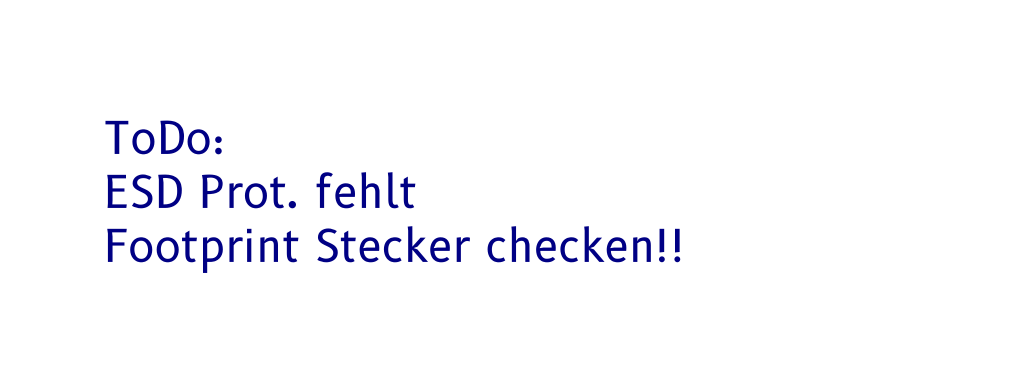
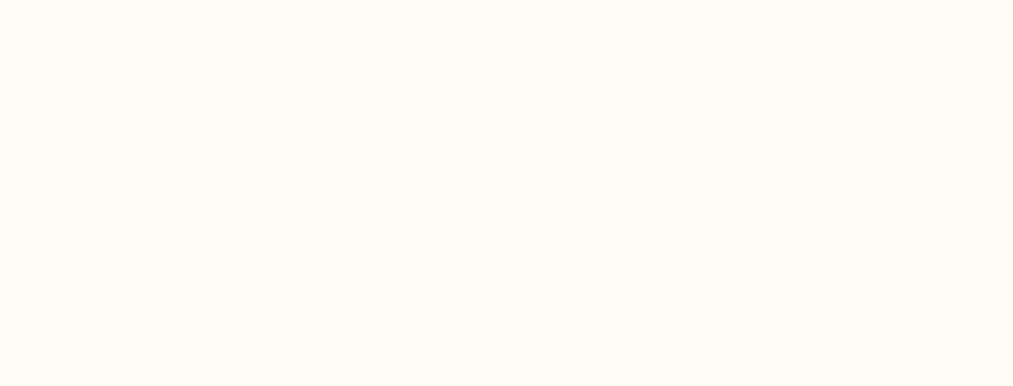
text: ToDo: (163, 137) -> none
text: ESD Prot. fehlt (261, 190) -> none
text: Footprint Stecker checken!! (393, 249) -> none

